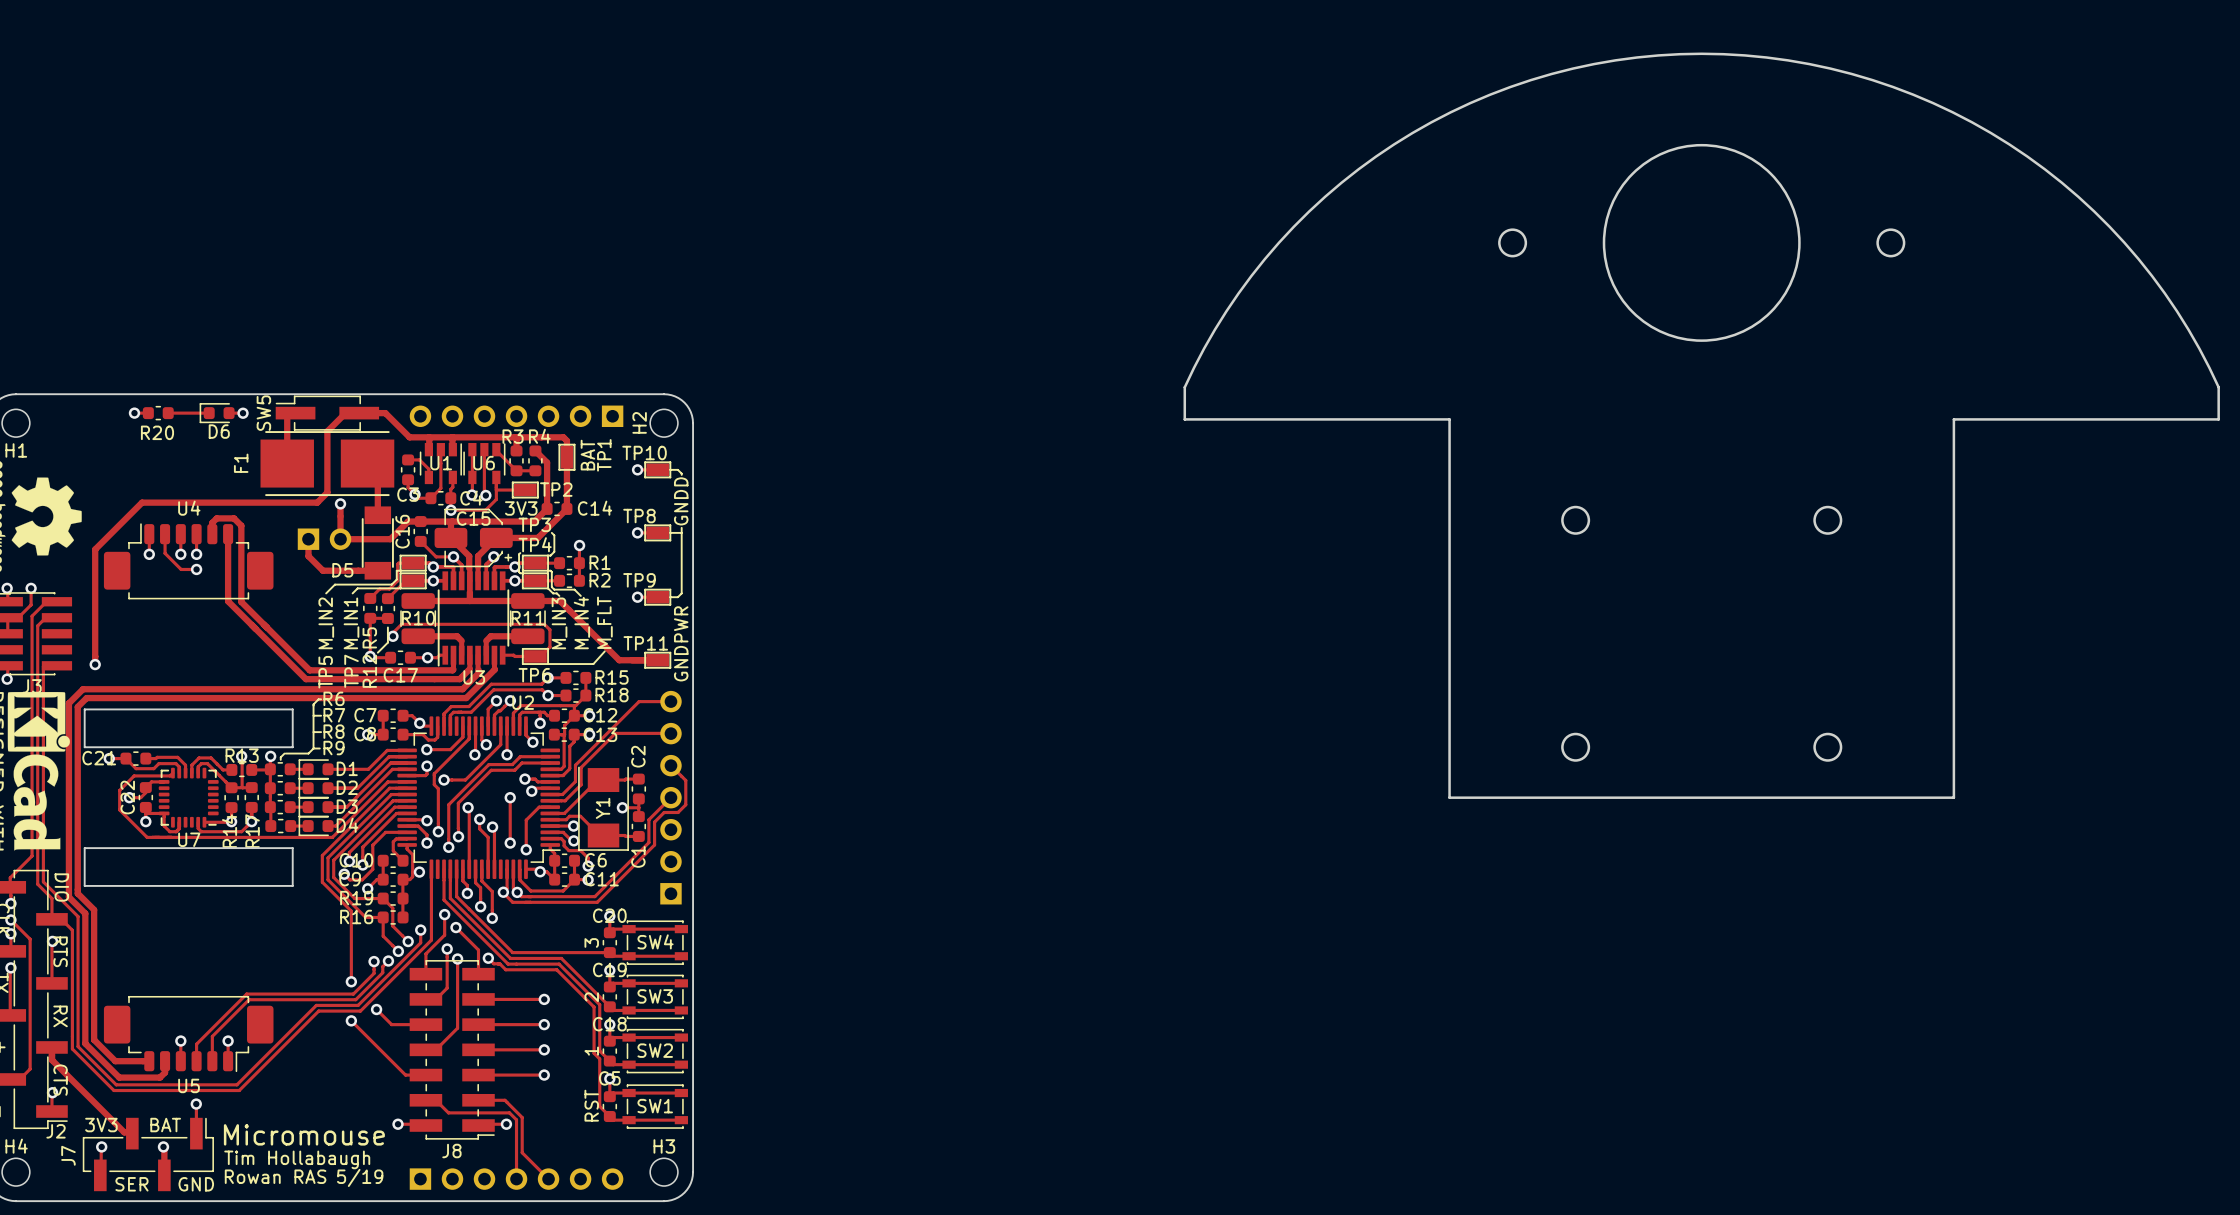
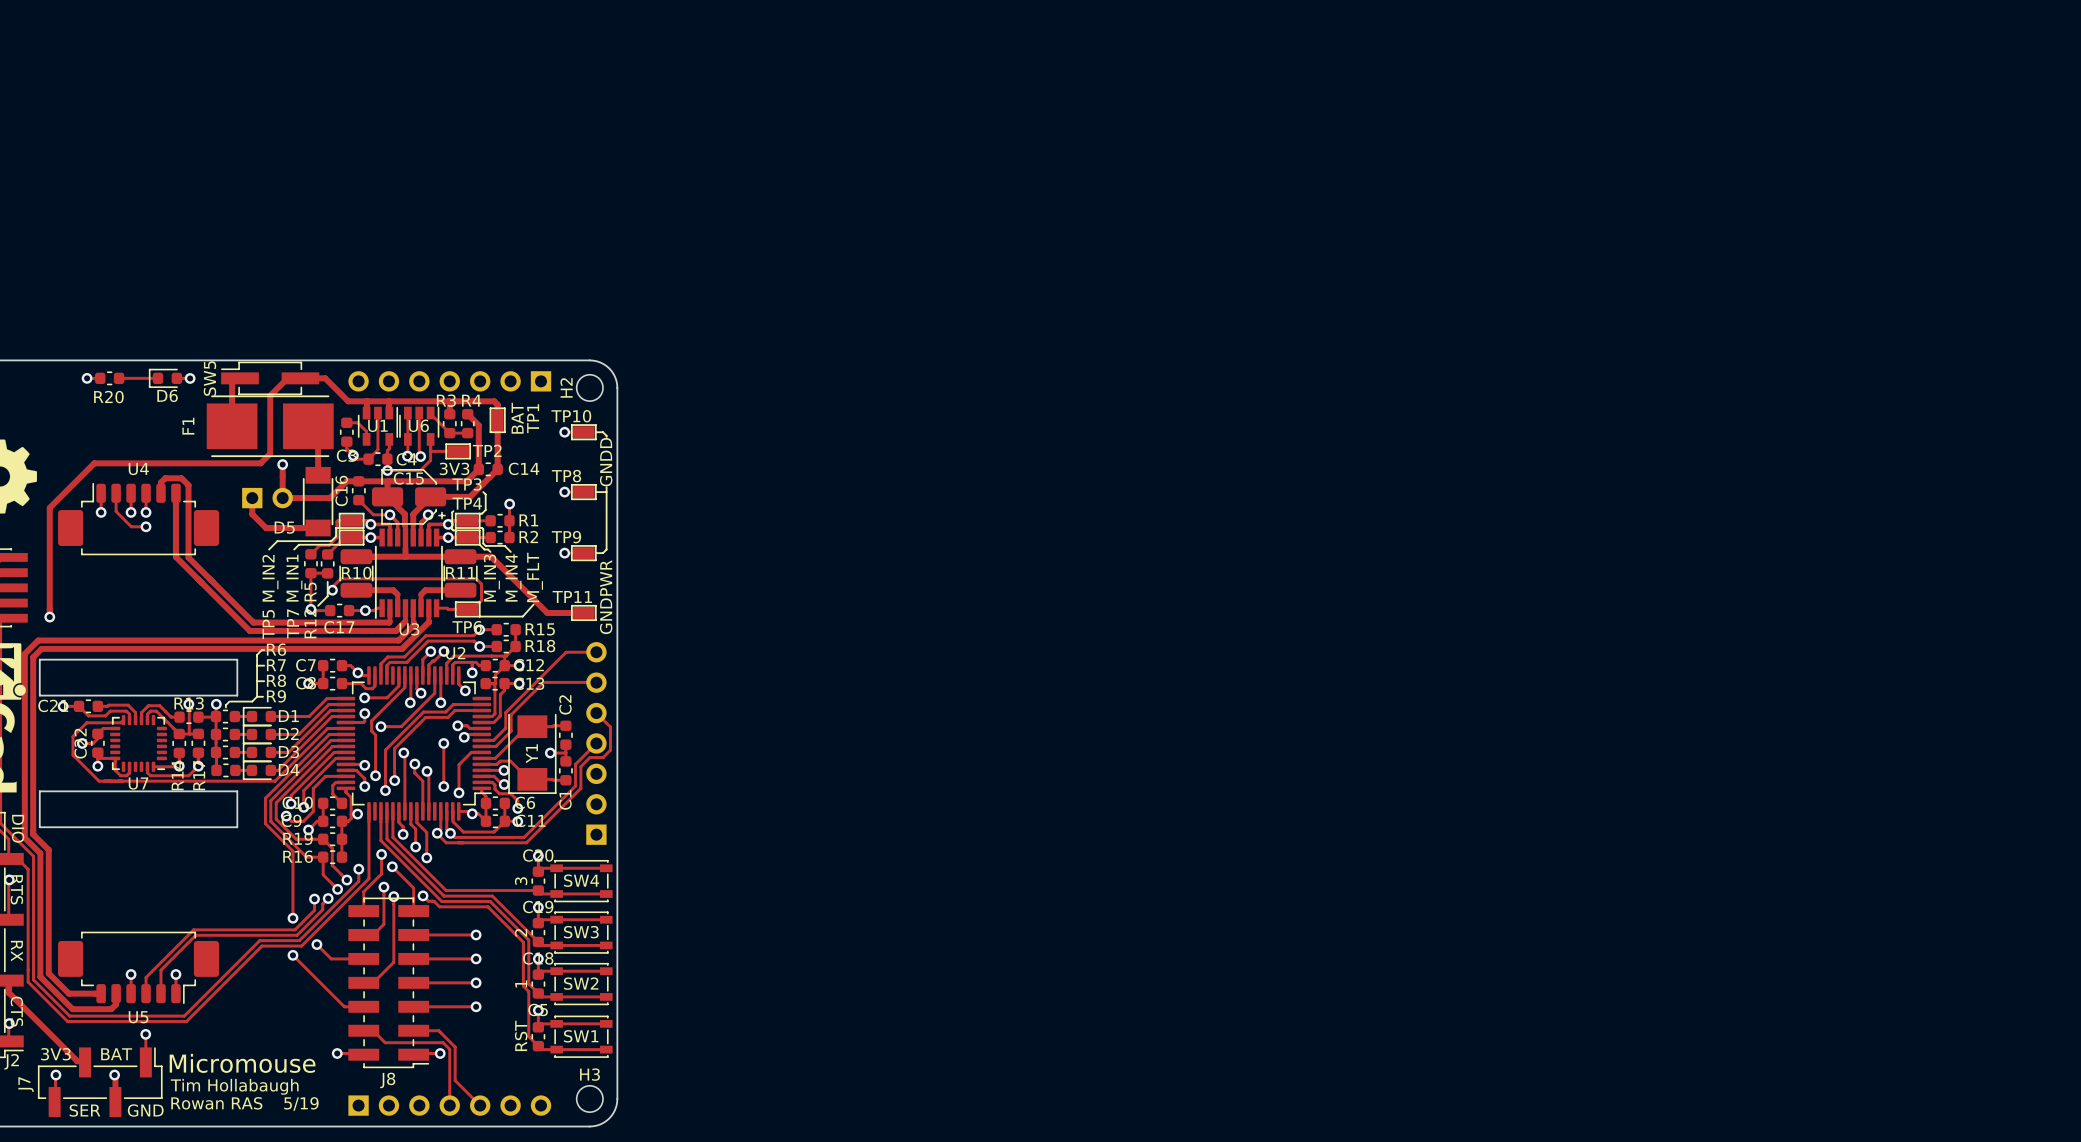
round board edge: [1602, 143, 1801, 342] -> none
round board edge: [1498, 228, 1528, 258] -> none
round board edge: [1876, 228, 1906, 258] -> none
board edge: (1184, 387) (1184, 419) (1449, 419) (1449, 797) (1953, 797) (1953, 419) (2218, 419) (2218, 387) (2199, 348) (2164, 293) (2138, 259) (2109, 226) (2078, 196) (2044, 169) (2009, 144) (1972, 122) (1933, 103) (1892, 86) (1851, 73) (1809, 64) (1766, 57) (1723, 54) (1680, 54) (1636, 57) (1594, 64) (1551, 73) (1510, 86) (1470, 103) (1431, 122) (1394, 144) (1358, 169) (1325, 196) (1279, 242) (1251, 275) (1226, 311) (1204, 348) (1184, 387) -> none
round board edge: [1561, 505, 1591, 535] -> none
round board edge: [1813, 505, 1843, 535] -> none
round board edge: [1561, 732, 1591, 762] -> none
round board edge: [1813, 732, 1843, 762] -> none

